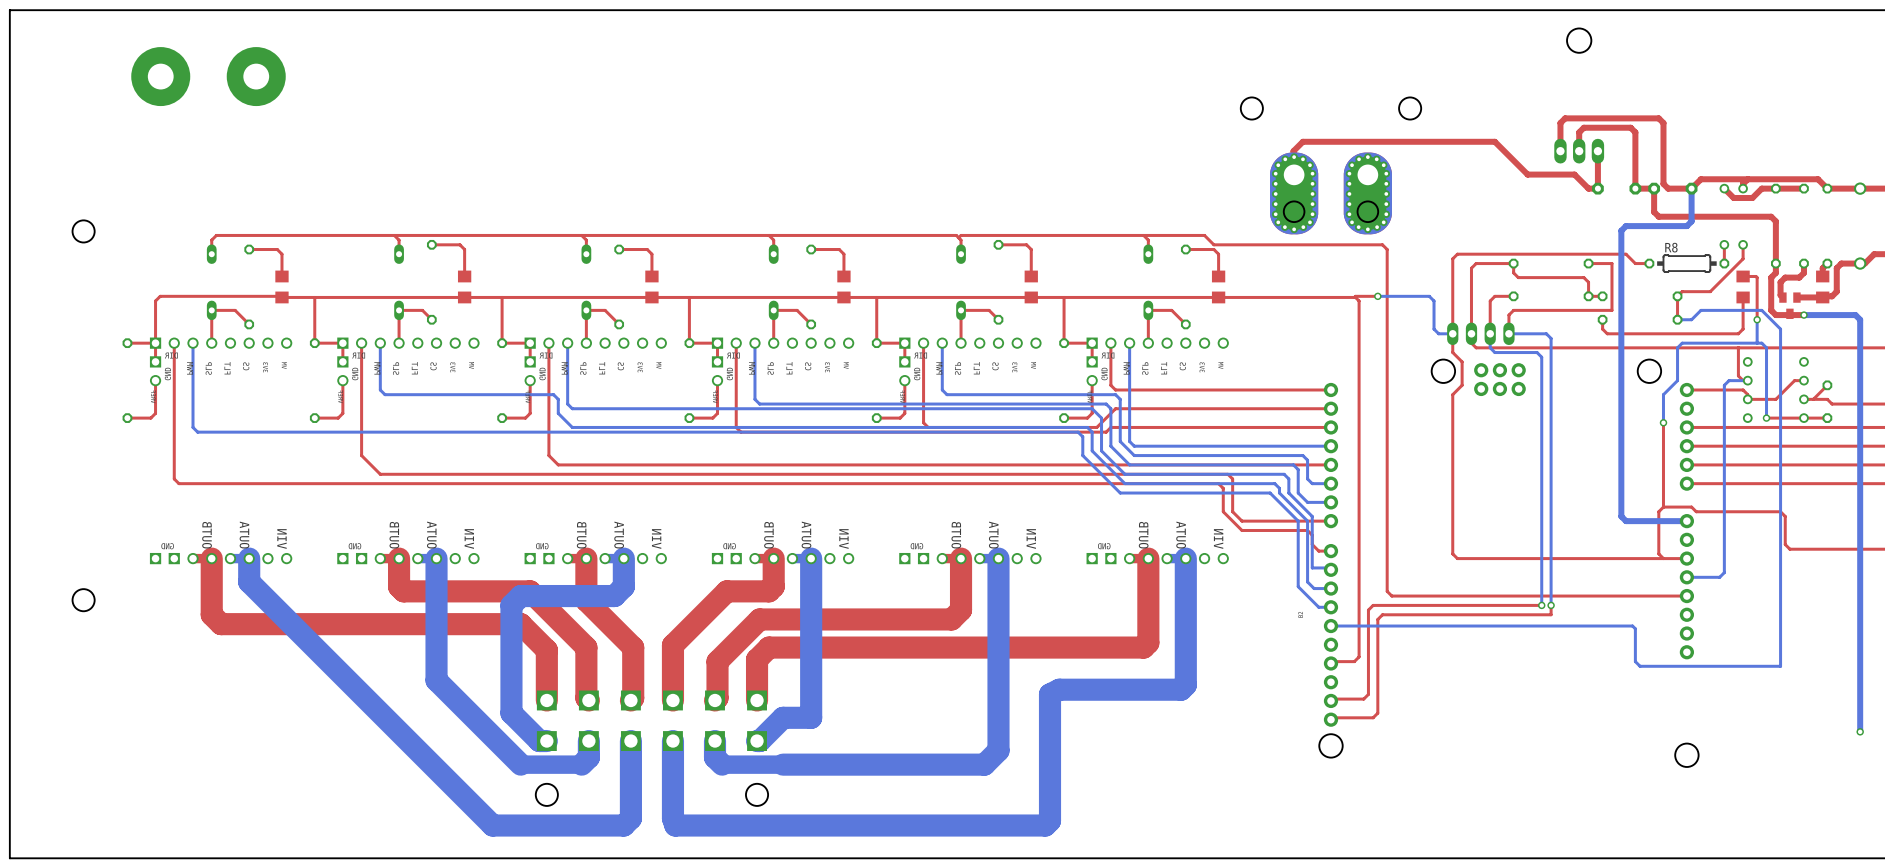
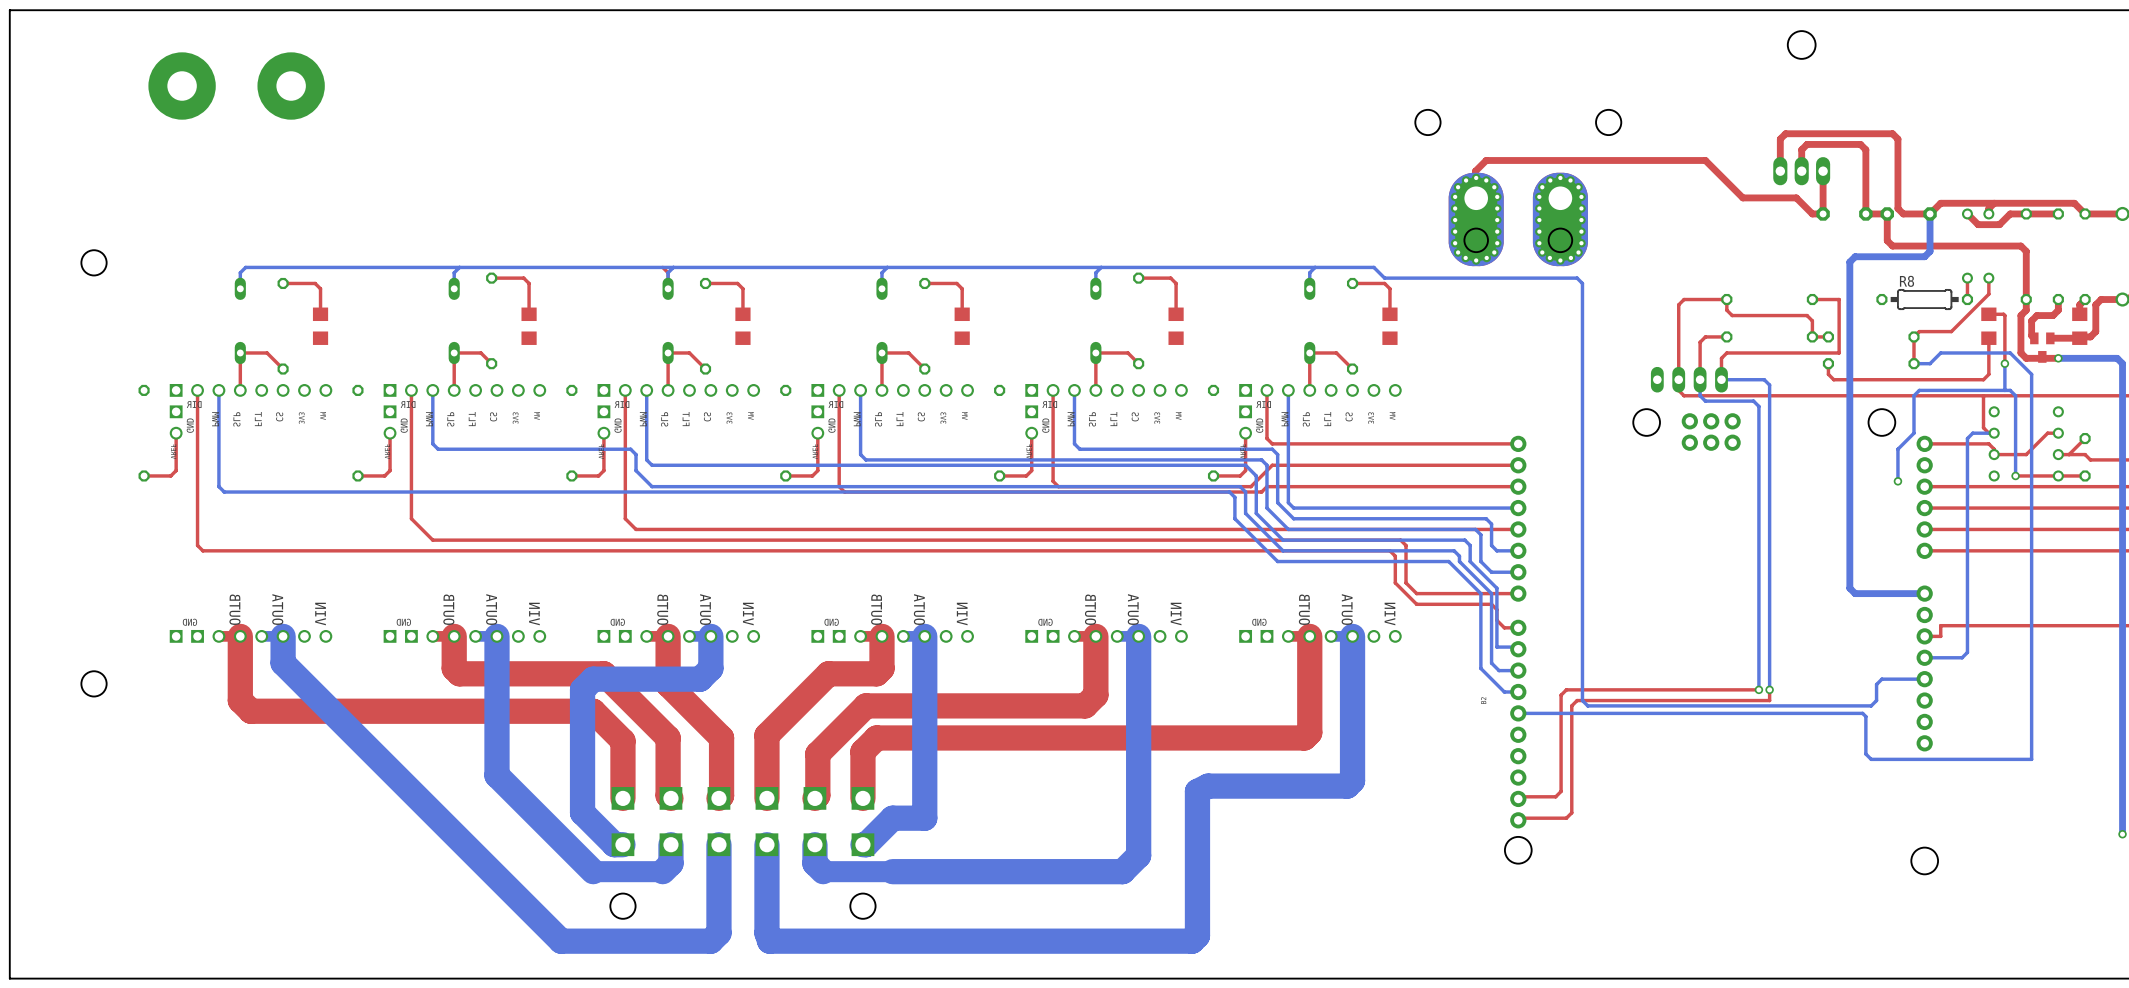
top track: (394, 235) (399, 240) (399, 254) -> none
bottom track: none -> (459, 267) (454, 272) (454, 288)
bottom track: none -> (673, 267) (668, 272) (668, 288)
top track: (769, 235) (773, 240) (773, 254) -> none
bottom track: none -> (887, 267) (881, 272) (881, 288)
bottom track: none -> (1101, 267) (1095, 272) (1095, 288)
top track: (1143, 235) (1148, 240) (1148, 254) -> none
bottom track: none -> (1315, 267) (1309, 272) (1309, 288)
top track: (958, 237) (961, 235) (1204, 235) (1213, 244) (1382, 244) (1387, 249) (1387, 591) (1391, 596) (1686, 596) -> none
bottom track: none -> (240, 288) (240, 272) (245, 267) (1373, 267) (1384, 278) (1577, 278) (1582, 283) (1582, 700) (1587, 705) (1871, 705) (1876, 700) (1876, 684) (1881, 679) (1924, 679)
top track: (961, 254) (961, 240) (956, 235) (216, 235) (211, 240) (211, 254) -> none
top track: (1649, 263) (1635, 263) (1626, 254) (1457, 254) (1452, 258) (1452, 352) (1462, 361) (1462, 385) (1452, 394) (1452, 553) (1457, 558) (1686, 558) -> none
top track: (1377, 296) (1354, 297) -> none
bottom track: (1377, 296) (1429, 296) (1434, 301) (1434, 329) (1438, 333) (1452, 333) -> none
via: (1377, 296) -> none
top track: (314, 297) (314, 343) (342, 343) (342, 361) -> none
top track: (502, 297) (502, 343) (530, 343) (530, 361) -> none
top track: (689, 297) (689, 343) (717, 343) (717, 361) -> none
top track: (876, 297) (876, 343) (904, 343) (904, 361) -> none
top track: (1064, 297) (1064, 343) (1092, 343) (1092, 361) -> none
top track: (155, 343) (127, 343) -> none
top track: (155, 361) (155, 301) (160, 296) (1355, 297) (1359, 301) (1359, 656) (1354, 661) (1332, 661) (1330, 663) -> none
top track: (1663, 422) (1663, 507) -> none
top track: (1663, 507) (1691, 507) (1696, 511) (1780, 511) (1785, 516) (1785, 544) (1789, 549) -> (1924, 636) (1940, 636) (1940, 625) (2042, 625)
top track: (1663, 507) (1658, 511) (1658, 553) (1663, 558) -> none

